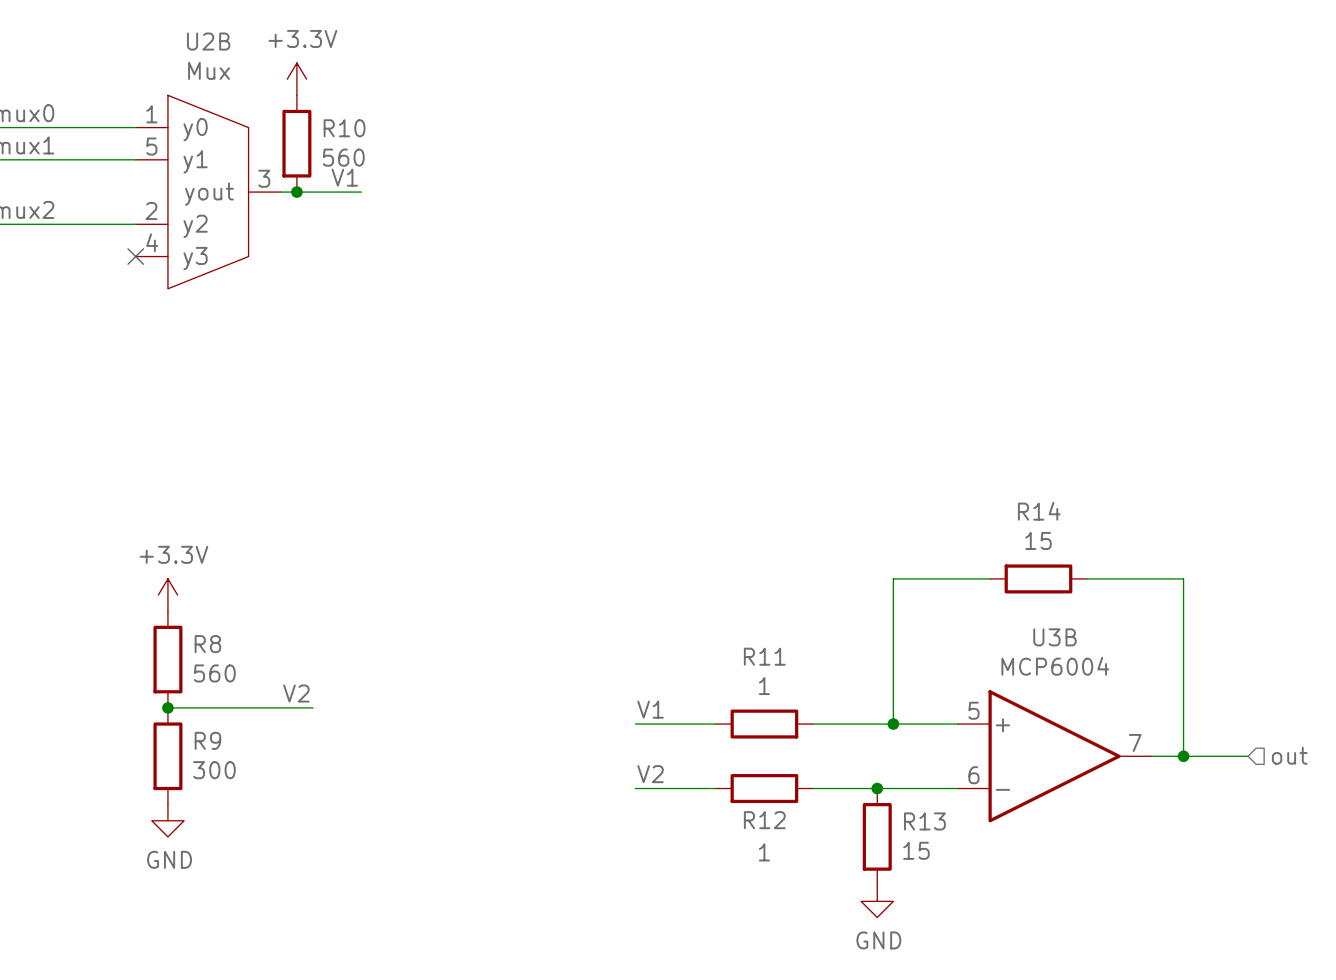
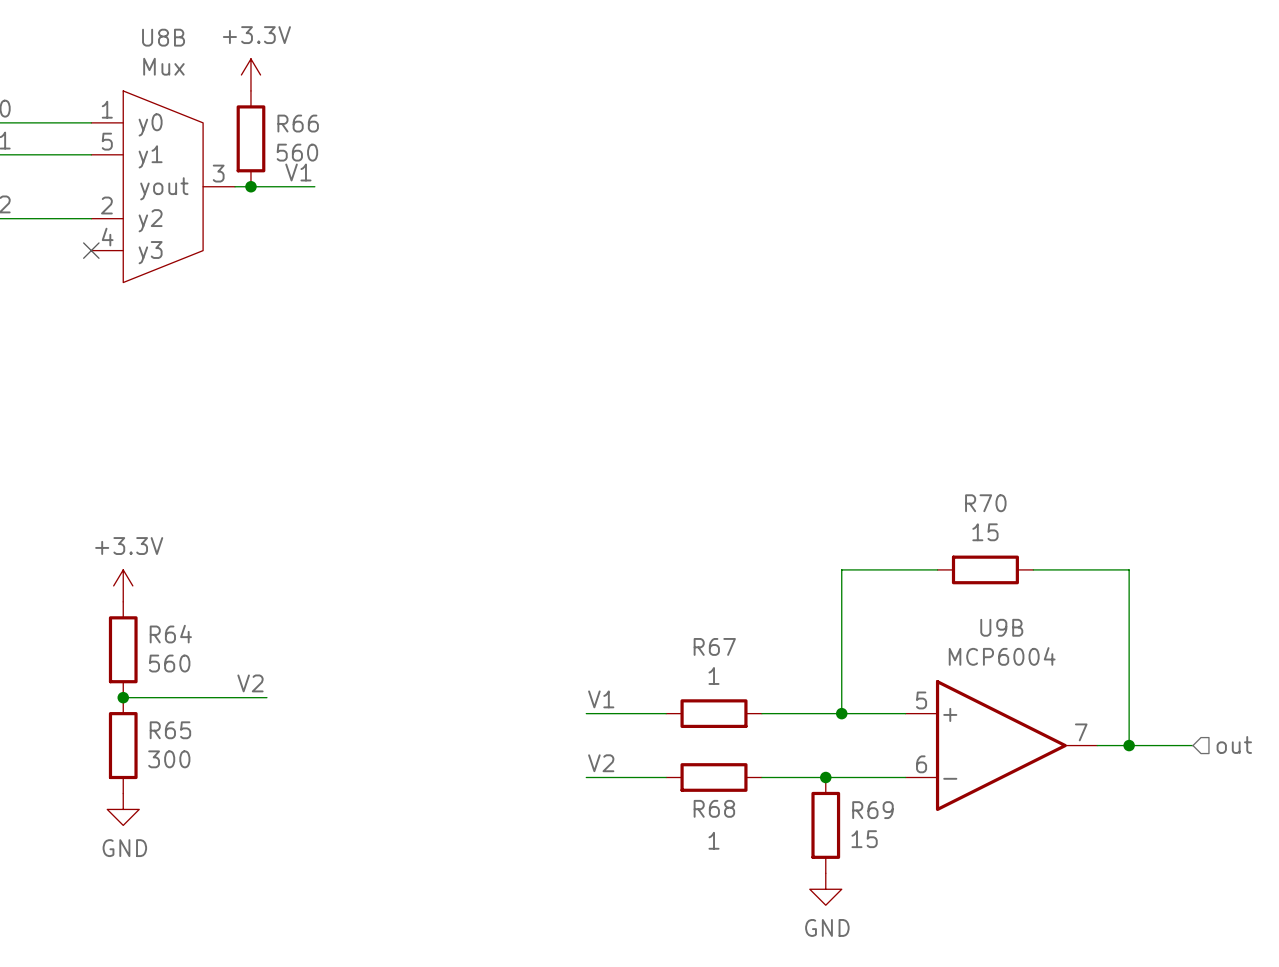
U2B name: U2B (208, 41) -> U8B (163, 37)
R10 name: R10 (344, 128) -> R66 (298, 123)
R14 name: R14 (1039, 511) -> R70 (985, 503)
U3B name: U3B (1054, 637) -> U9B (1001, 627)
R8 name: R8 (207, 644) -> R64 (170, 634)
R11 name: R11 (764, 656) -> R67 (714, 646)
R9 name: R9 (207, 740) -> R65 (170, 730)
R12 name: R12 (764, 820) -> R68 (714, 808)
R13 name: R13 (924, 821) -> R69 (872, 810)

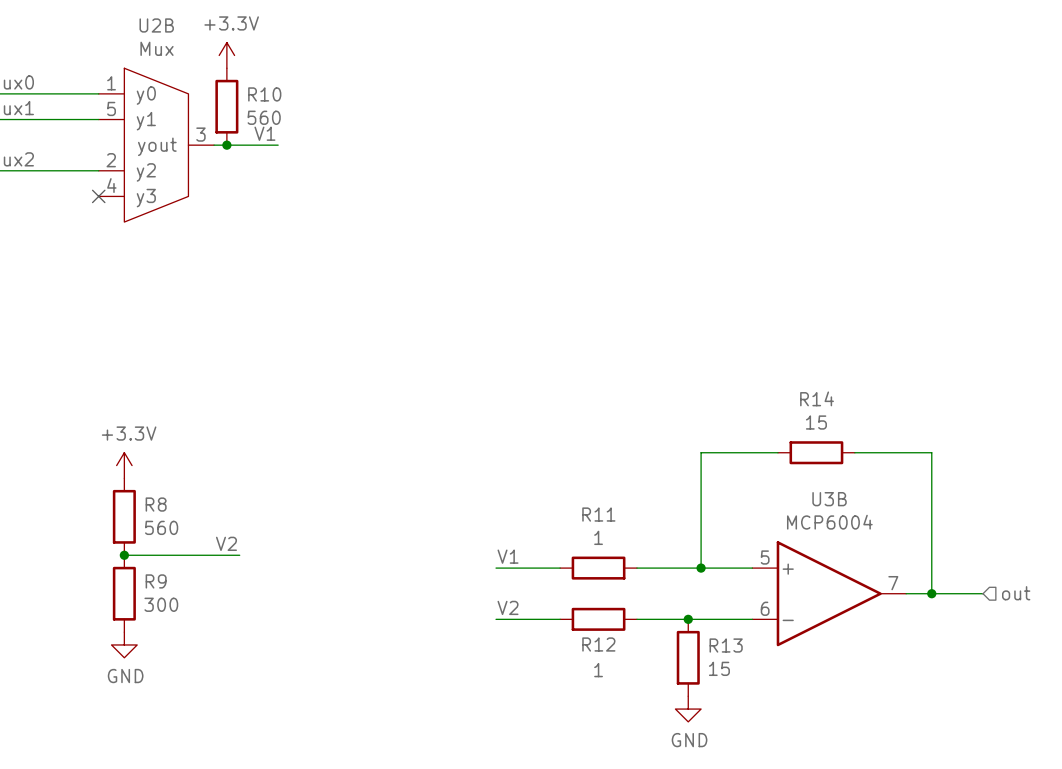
U8B name: U8B (163, 37) -> U2B (156, 25)
R66 name: R66 (298, 123) -> R10 (264, 94)
R70 name: R70 (985, 503) -> R14 (817, 398)
U9B name: U9B (1001, 627) -> U3B (829, 499)
R64 name: R64 (170, 634) -> R8 (156, 504)
R67 name: R67 (714, 646) -> R11 (598, 514)
R65 name: R65 (170, 730) -> R9 (156, 581)
R68 name: R68 (714, 808) -> R12 (598, 644)
R69 name: R69 (872, 810) -> R13 (726, 645)

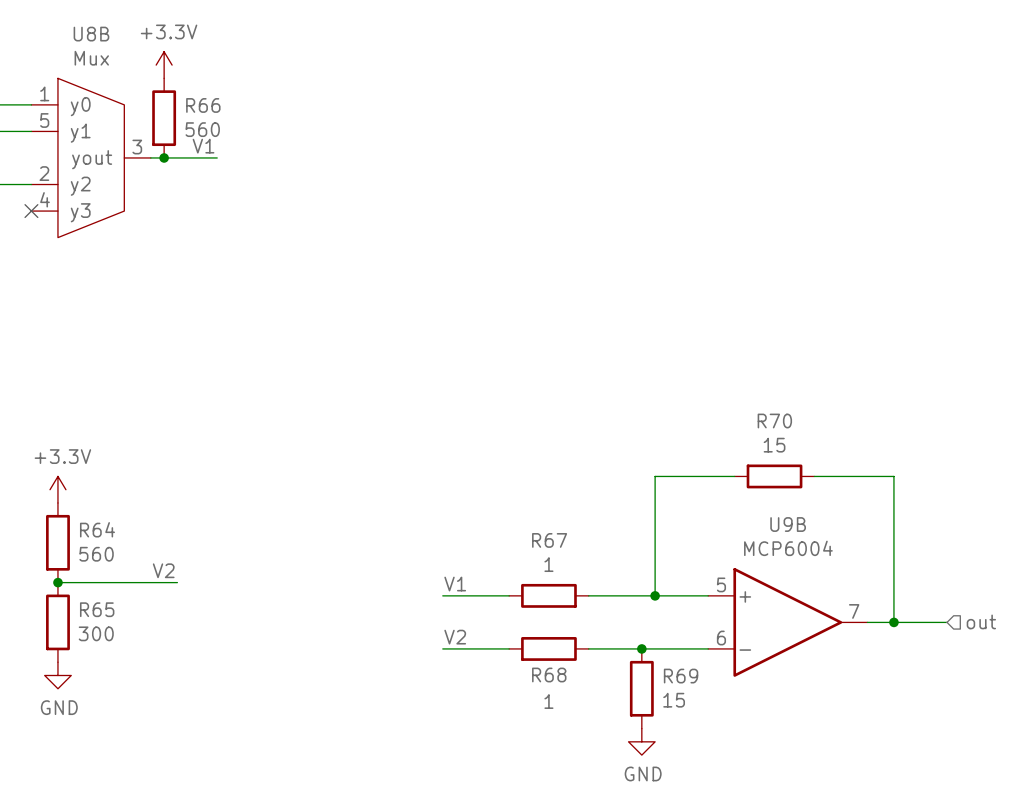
U2B name: U2B (156, 25) -> U8B (91, 34)
R10 name: R10 (264, 94) -> R66 (203, 105)
R14 name: R14 (817, 398) -> R70 (774, 421)
U3B name: U3B (829, 499) -> U9B (788, 524)
R8 name: R8 (156, 504) -> R64 (97, 529)
R11 name: R11 (598, 514) -> R67 (549, 540)
R9 name: R9 (156, 581) -> R65 (97, 609)
R12 name: R12 (598, 644) -> R68 (549, 674)
R13 name: R13 (726, 645) -> R69 (681, 676)

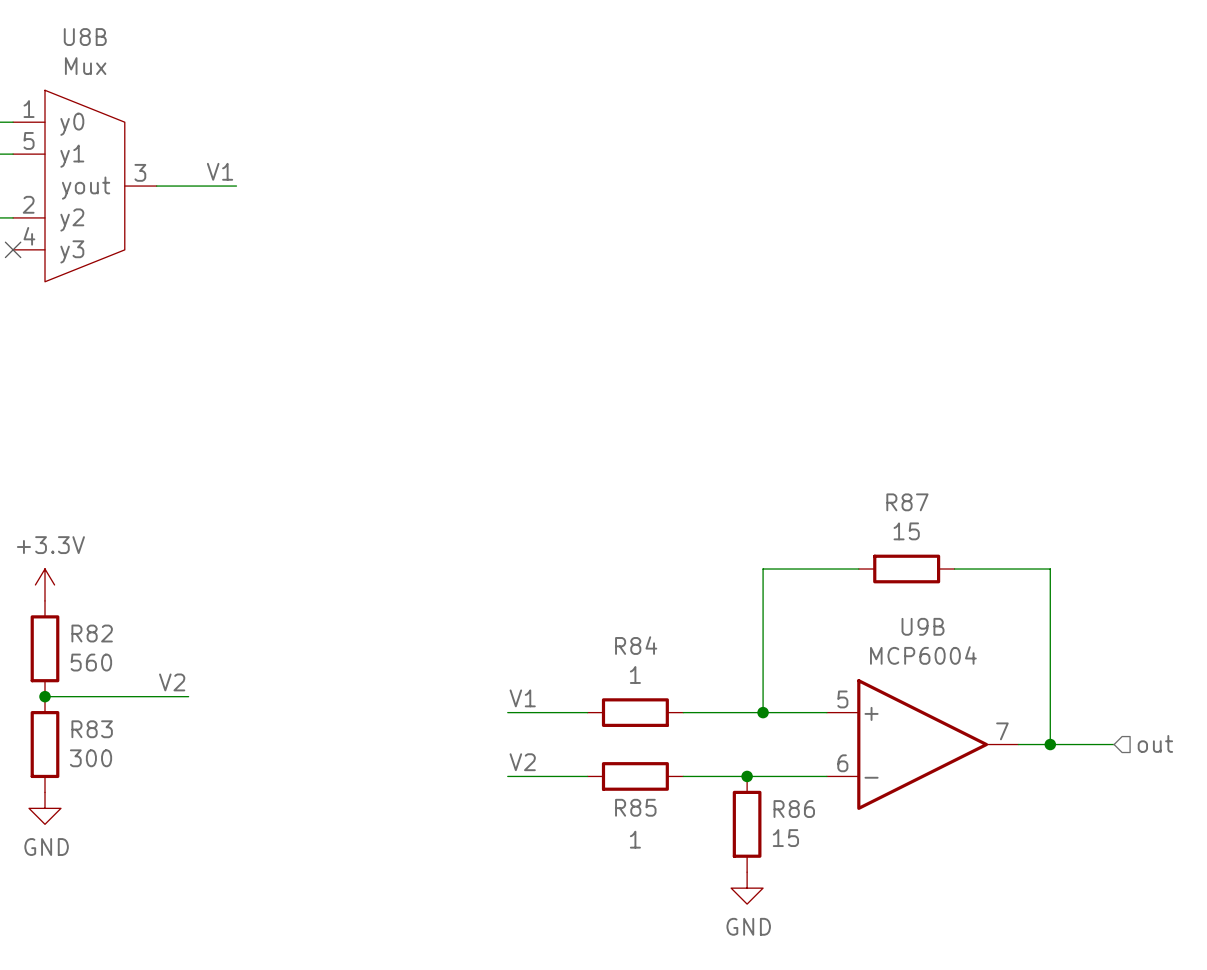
power symbol: +3.3V (164, 65) -> none
R66: 560 (164, 118) -> none
junction: (164, 157) -> none
R70 name: R70 (774, 421) -> R87 (907, 502)
R64 name: R64 (97, 529) -> R82 (92, 633)
R67 name: R67 (549, 540) -> R84 (636, 645)
R65 name: R65 (97, 609) -> R83 (92, 729)
R68 name: R68 (549, 674) -> R85 (635, 807)
R69 name: R69 (681, 676) -> R86 (794, 809)

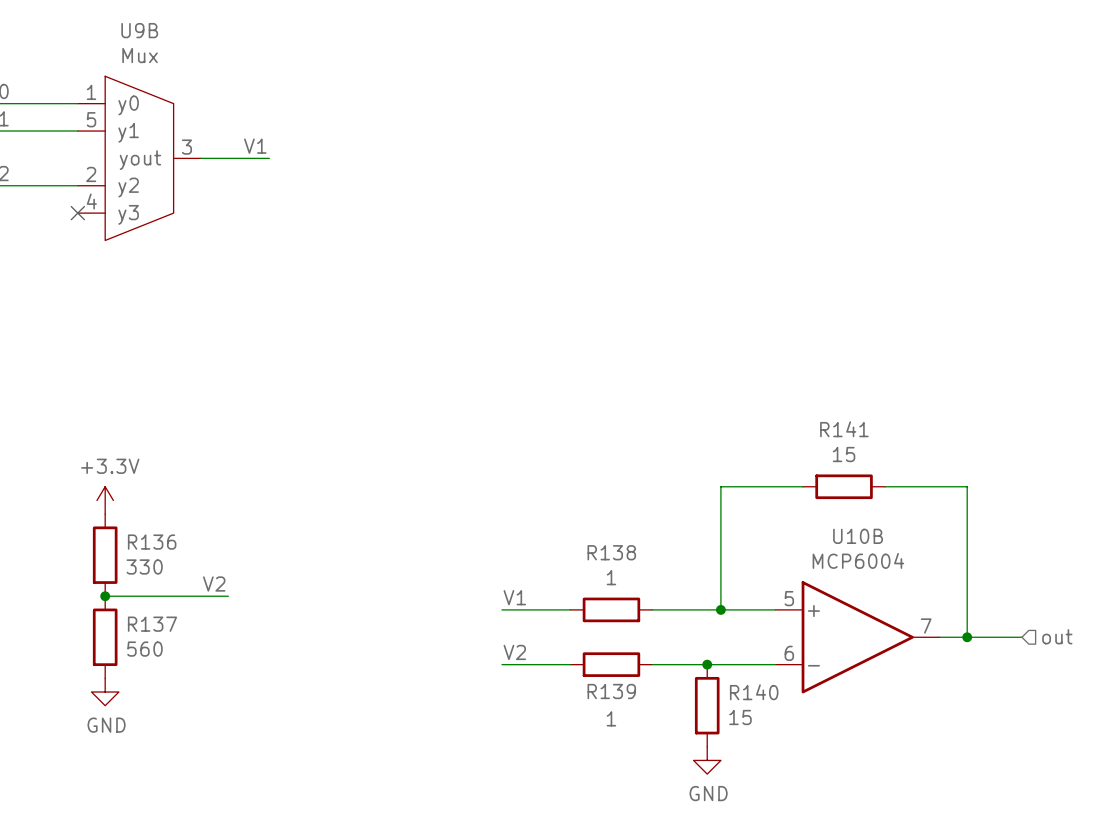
U8B name: U8B (85, 37) -> U9B (139, 30)
R87 name: R87 (907, 502) -> R141 (844, 429)
U9B name: U9B (923, 626) -> U10B (858, 536)
R82 name: R82 (92, 633) -> R136 (152, 542)
R84 name: R84 (636, 645) -> R138 (611, 552)
R82 value: 560 (91, 662) -> 330 (144, 566)
R83 name: R83 (92, 729) -> R137 (152, 624)
R83 value: 300 (91, 758) -> 560 (144, 649)
R85 name: R85 (635, 807) -> R139 (611, 691)
R86 name: R86 (794, 809) -> R140 (754, 692)

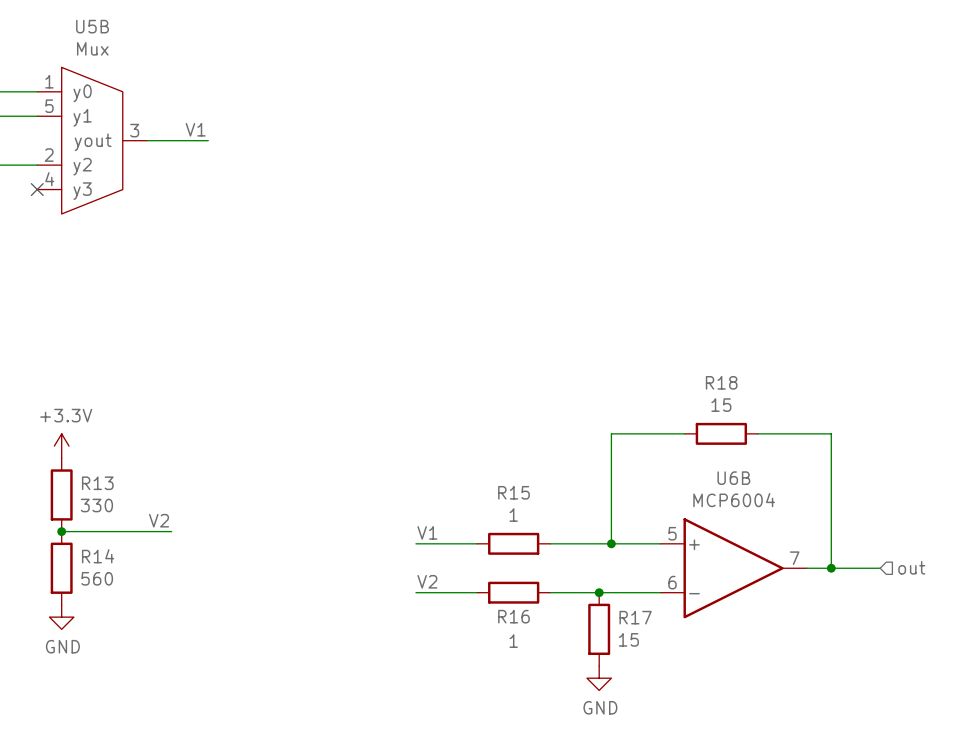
U9B name: U9B (139, 30) -> U5B (92, 26)
R141 name: R141 (844, 429) -> R18 (721, 382)
U10B name: U10B (858, 536) -> U6B (733, 478)
R136 name: R136 (152, 542) -> R13 (97, 483)
R138 name: R138 (611, 552) -> R15 (513, 492)
R137 name: R137 (152, 624) -> R14 (98, 556)
R139 name: R139 (611, 691) -> R16 (513, 616)
R140 name: R140 (754, 692) -> R17 (635, 617)

